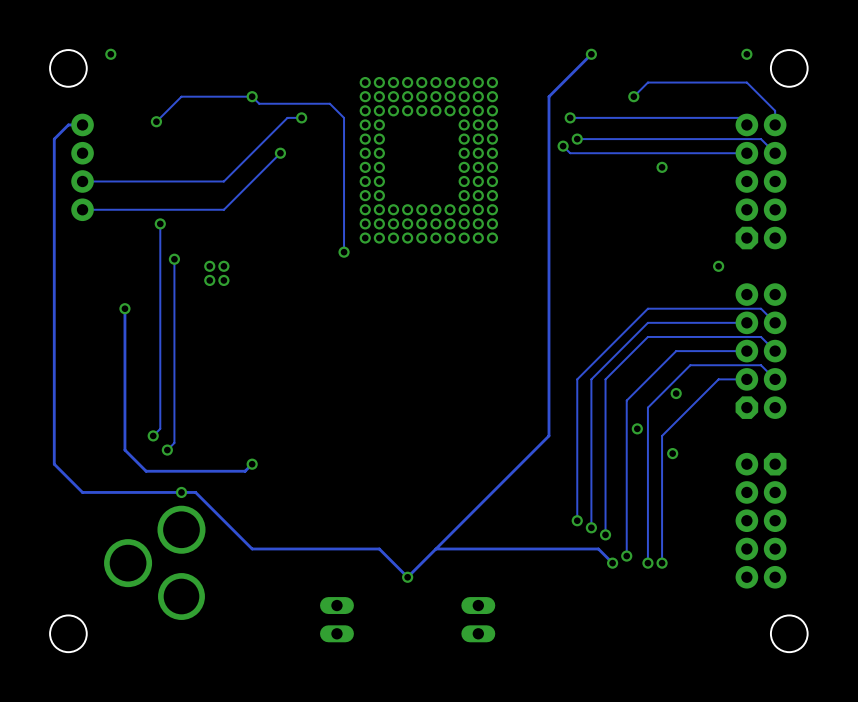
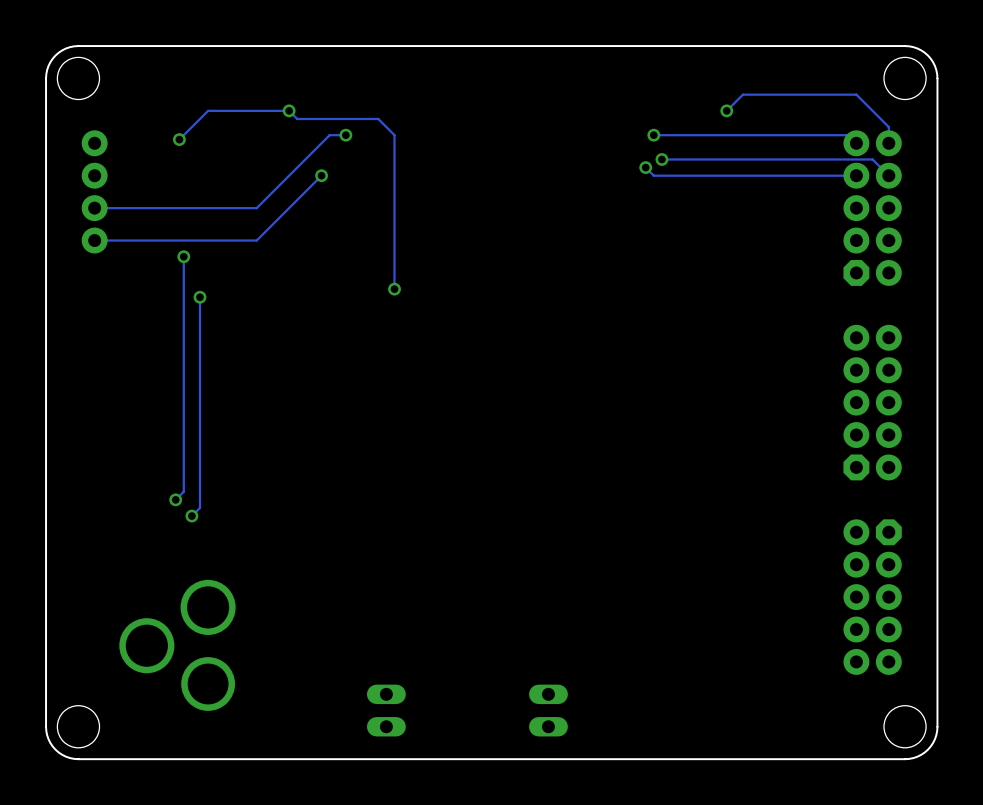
board edge: none -> (905, 46) (78, 46) (70, 47) (58, 52) (48, 66) (46, 78) (46, 726) (47, 735) (52, 746) (66, 756) (78, 759) (905, 759) (913, 758) (924, 752) (934, 739) (937, 726) (937, 78) (934, 66) (927, 55) (917, 48) (905, 46)
via: (110, 54) -> none
track: (591, 54) (548, 96) (548, 435) (407, 577) -> none
via: (591, 54) -> none
via: (746, 54) -> none
via: (365, 82) -> none
via: (379, 82) -> none
via: (393, 82) -> none
via: (407, 82) -> none
via: (421, 82) -> none
via: (435, 82) -> none
via: (450, 82) -> none
via: (464, 82) -> none
via: (478, 82) -> none
via: (492, 82) -> none
via: (365, 96) -> none
via: (379, 96) -> none
via: (393, 96) -> none
via: (407, 96) -> none
via: (421, 96) -> none
via: (435, 96) -> none
via: (450, 96) -> none
via: (464, 96) -> none
via: (478, 96) -> none
via: (492, 96) -> none
via: (365, 110) -> none
via: (379, 110) -> none
via: (393, 110) -> none
via: (407, 110) -> none
via: (421, 110) -> none
via: (435, 110) -> none
via: (450, 110) -> none
via: (464, 110) -> none
via: (478, 110) -> none
via: (492, 110) -> none
track: (82, 124) (68, 124) (54, 139) (54, 464) (82, 492) (195, 492) (252, 548) (379, 548) (407, 577) -> none
via: (365, 124) -> none
via: (379, 124) -> none
via: (464, 124) -> none
via: (478, 124) -> none
via: (492, 124) -> none
via: (365, 139) -> none
via: (379, 139) -> none
via: (464, 139) -> none
via: (478, 139) -> none
via: (492, 139) -> none
via: (365, 153) -> none
via: (379, 153) -> none
via: (464, 153) -> none
via: (478, 153) -> none
via: (492, 153) -> none
via: (365, 167) -> none
via: (379, 167) -> none
via: (464, 167) -> none
via: (478, 167) -> none
via: (492, 167) -> none
via: (662, 167) -> none
via: (365, 181) -> none
via: (379, 181) -> none
via: (464, 181) -> none
via: (478, 181) -> none
via: (492, 181) -> none
via: (365, 195) -> none
via: (379, 195) -> none
via: (464, 195) -> none
via: (478, 195) -> none
via: (492, 195) -> none
via: (365, 209) -> none
via: (379, 209) -> none
via: (393, 209) -> none
via: (407, 209) -> none
via: (421, 209) -> none
via: (435, 209) -> none
via: (450, 209) -> none
via: (464, 209) -> none
via: (478, 209) -> none
via: (492, 209) -> none
via: (365, 223) -> none
via: (379, 223) -> none
via: (393, 223) -> none
via: (407, 223) -> none
via: (421, 223) -> none
via: (435, 223) -> none
via: (450, 223) -> none
via: (464, 223) -> none
via: (478, 223) -> none
via: (492, 223) -> none
via: (365, 238) -> none
via: (379, 238) -> none
via: (393, 238) -> none
via: (407, 238) -> none
via: (421, 238) -> none
via: (435, 238) -> none
via: (450, 238) -> none
via: (464, 238) -> none
via: (478, 238) -> none
via: (492, 238) -> none
via: (209, 266) -> none
via: (223, 266) -> none
via: (718, 266) -> none
via: (209, 280) -> none
via: (223, 280) -> none
track: (124, 308) (124, 450) (146, 471) (245, 471) (252, 464) -> none
via: (124, 308) -> none
track: (746, 322) (647, 322) (591, 379) (591, 527) -> none
track: (775, 322) (761, 308) (647, 308) (577, 379) (577, 520) -> none
track: (746, 351) (676, 351) (626, 400) (626, 556) -> none
track: (775, 351) (761, 336) (647, 336) (605, 379) (605, 534) -> none
track: (746, 379) (718, 379) (662, 435) (662, 563) -> none
track: (775, 379) (761, 365) (690, 365) (647, 407) (647, 563) -> none
via: (676, 393) -> none
via: (637, 428) -> none
via: (672, 453) -> none
via: (252, 464) -> none
via: (181, 492) -> none
via: (577, 520) -> none
via: (591, 527) -> none
via: (605, 534) -> none
via: (626, 556) -> none
track: (612, 563) (598, 548) (435, 548) (407, 577) -> none
via: (612, 563) -> none
via: (647, 563) -> none
via: (662, 563) -> none
via: (407, 577) -> none

